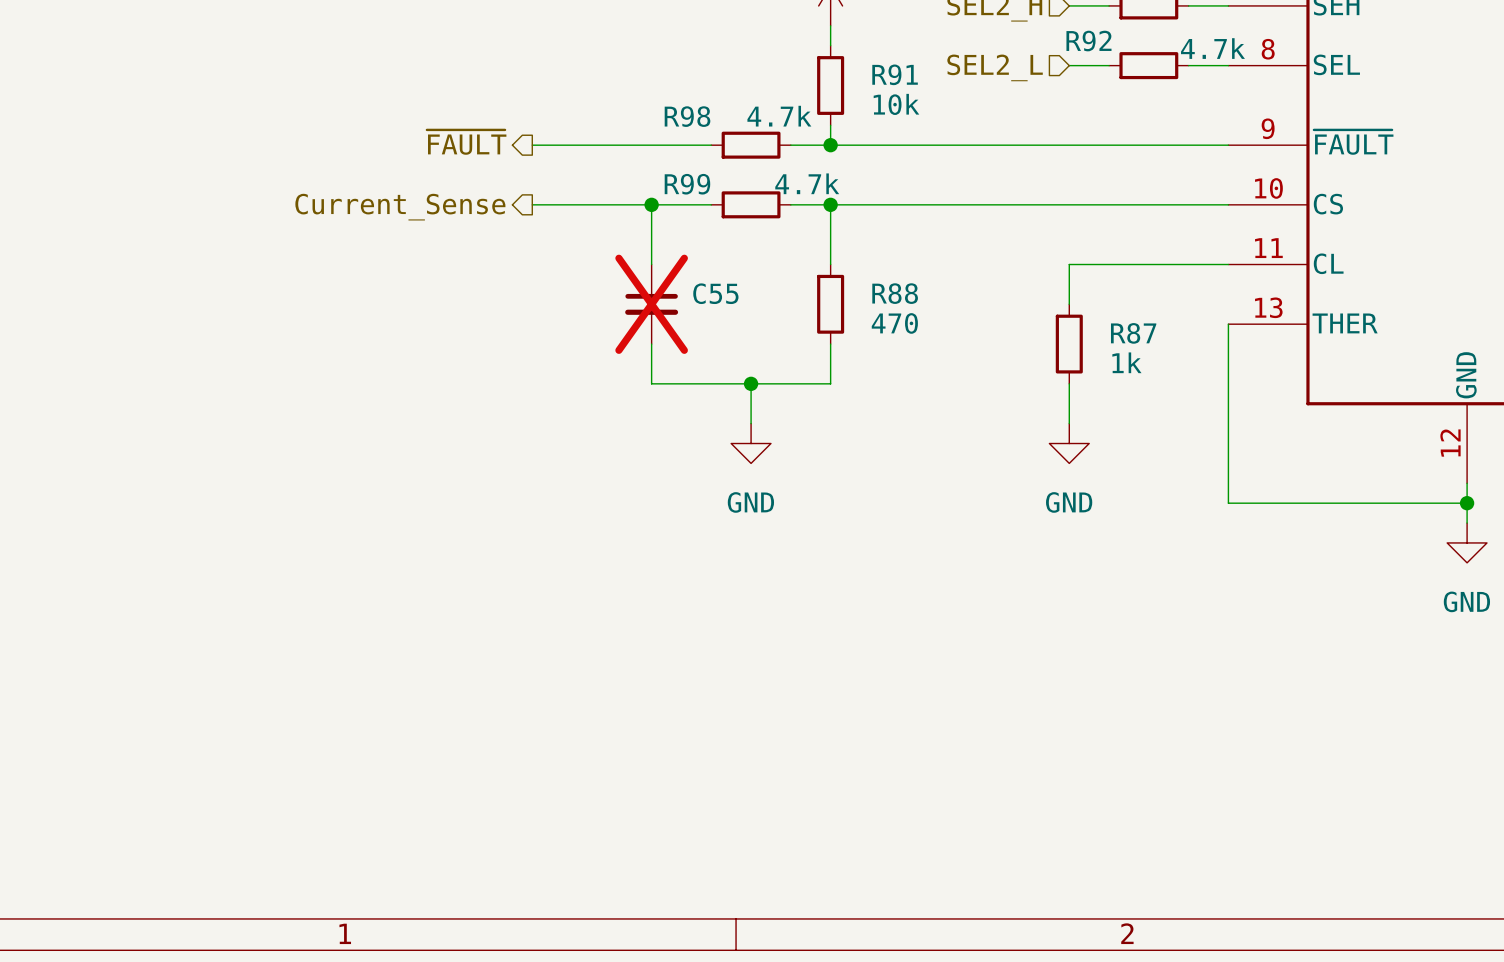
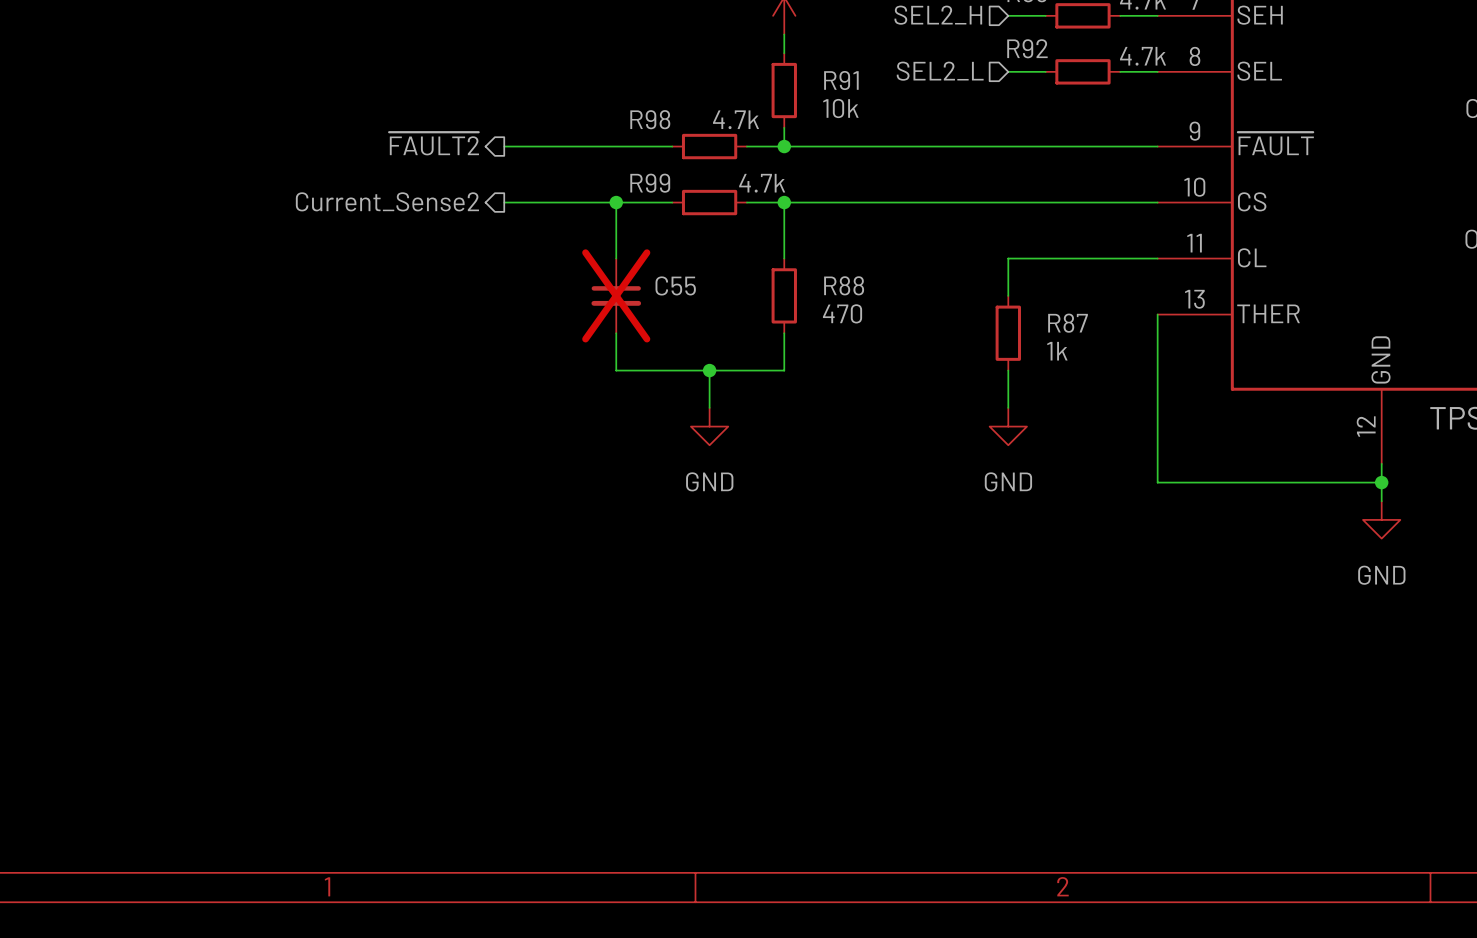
hierarchical label: ~{FAULT} (466, 142) -> ~{FAULT2} (434, 143)
hierarchical label: Current_Sense (400, 207) -> Current_Sense2 (387, 201)

